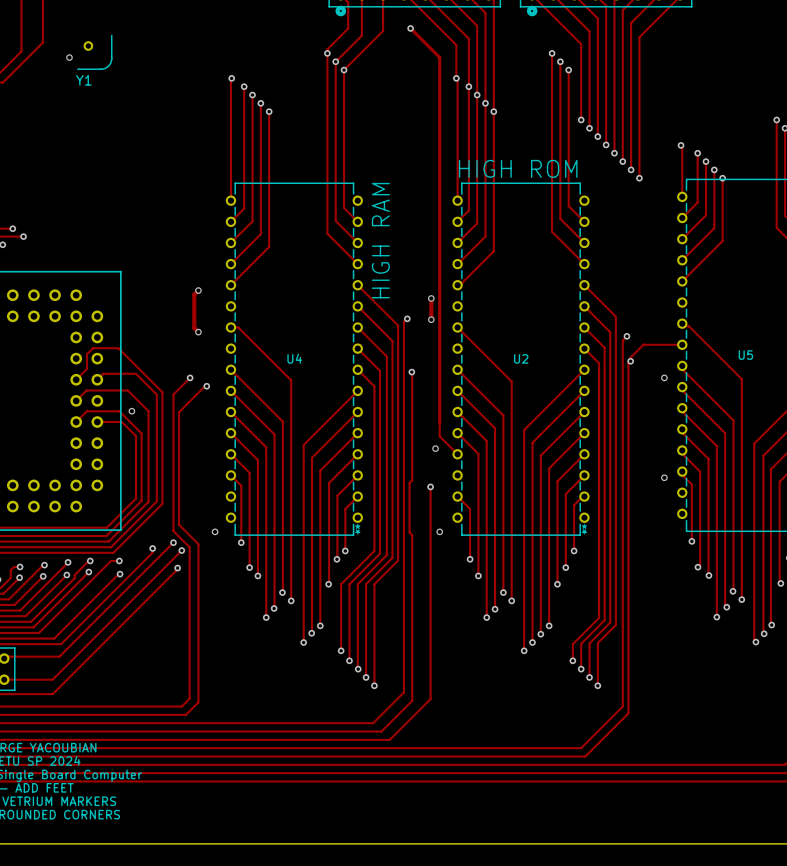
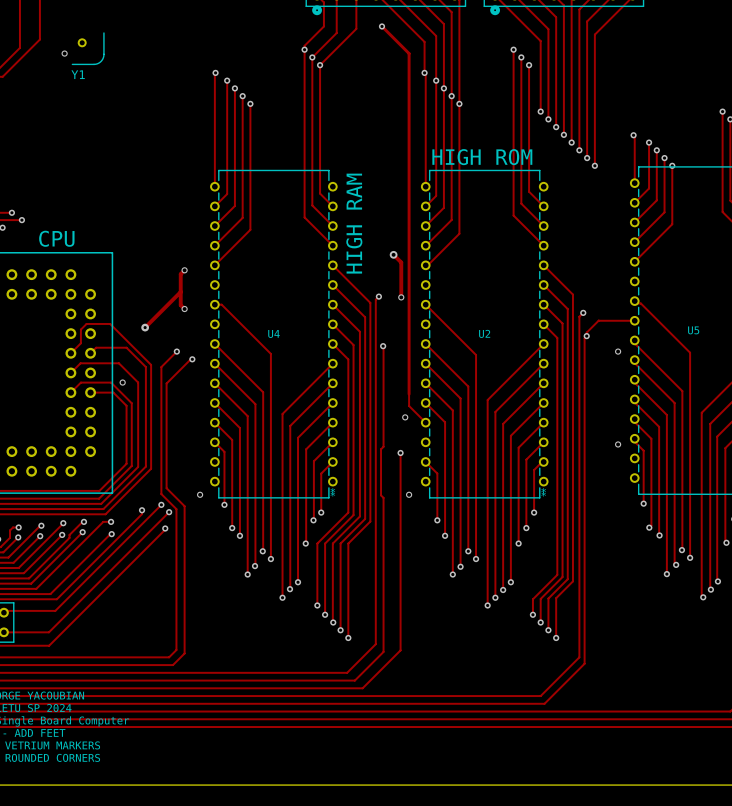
text: none -> CPU (56, 238)
track: none -> (393, 254) (401, 262) (401, 277)
via: none -> (393, 254)
via: (431, 298) -> none
track: none -> (180, 291) (145, 327)
via: none -> (145, 327)

